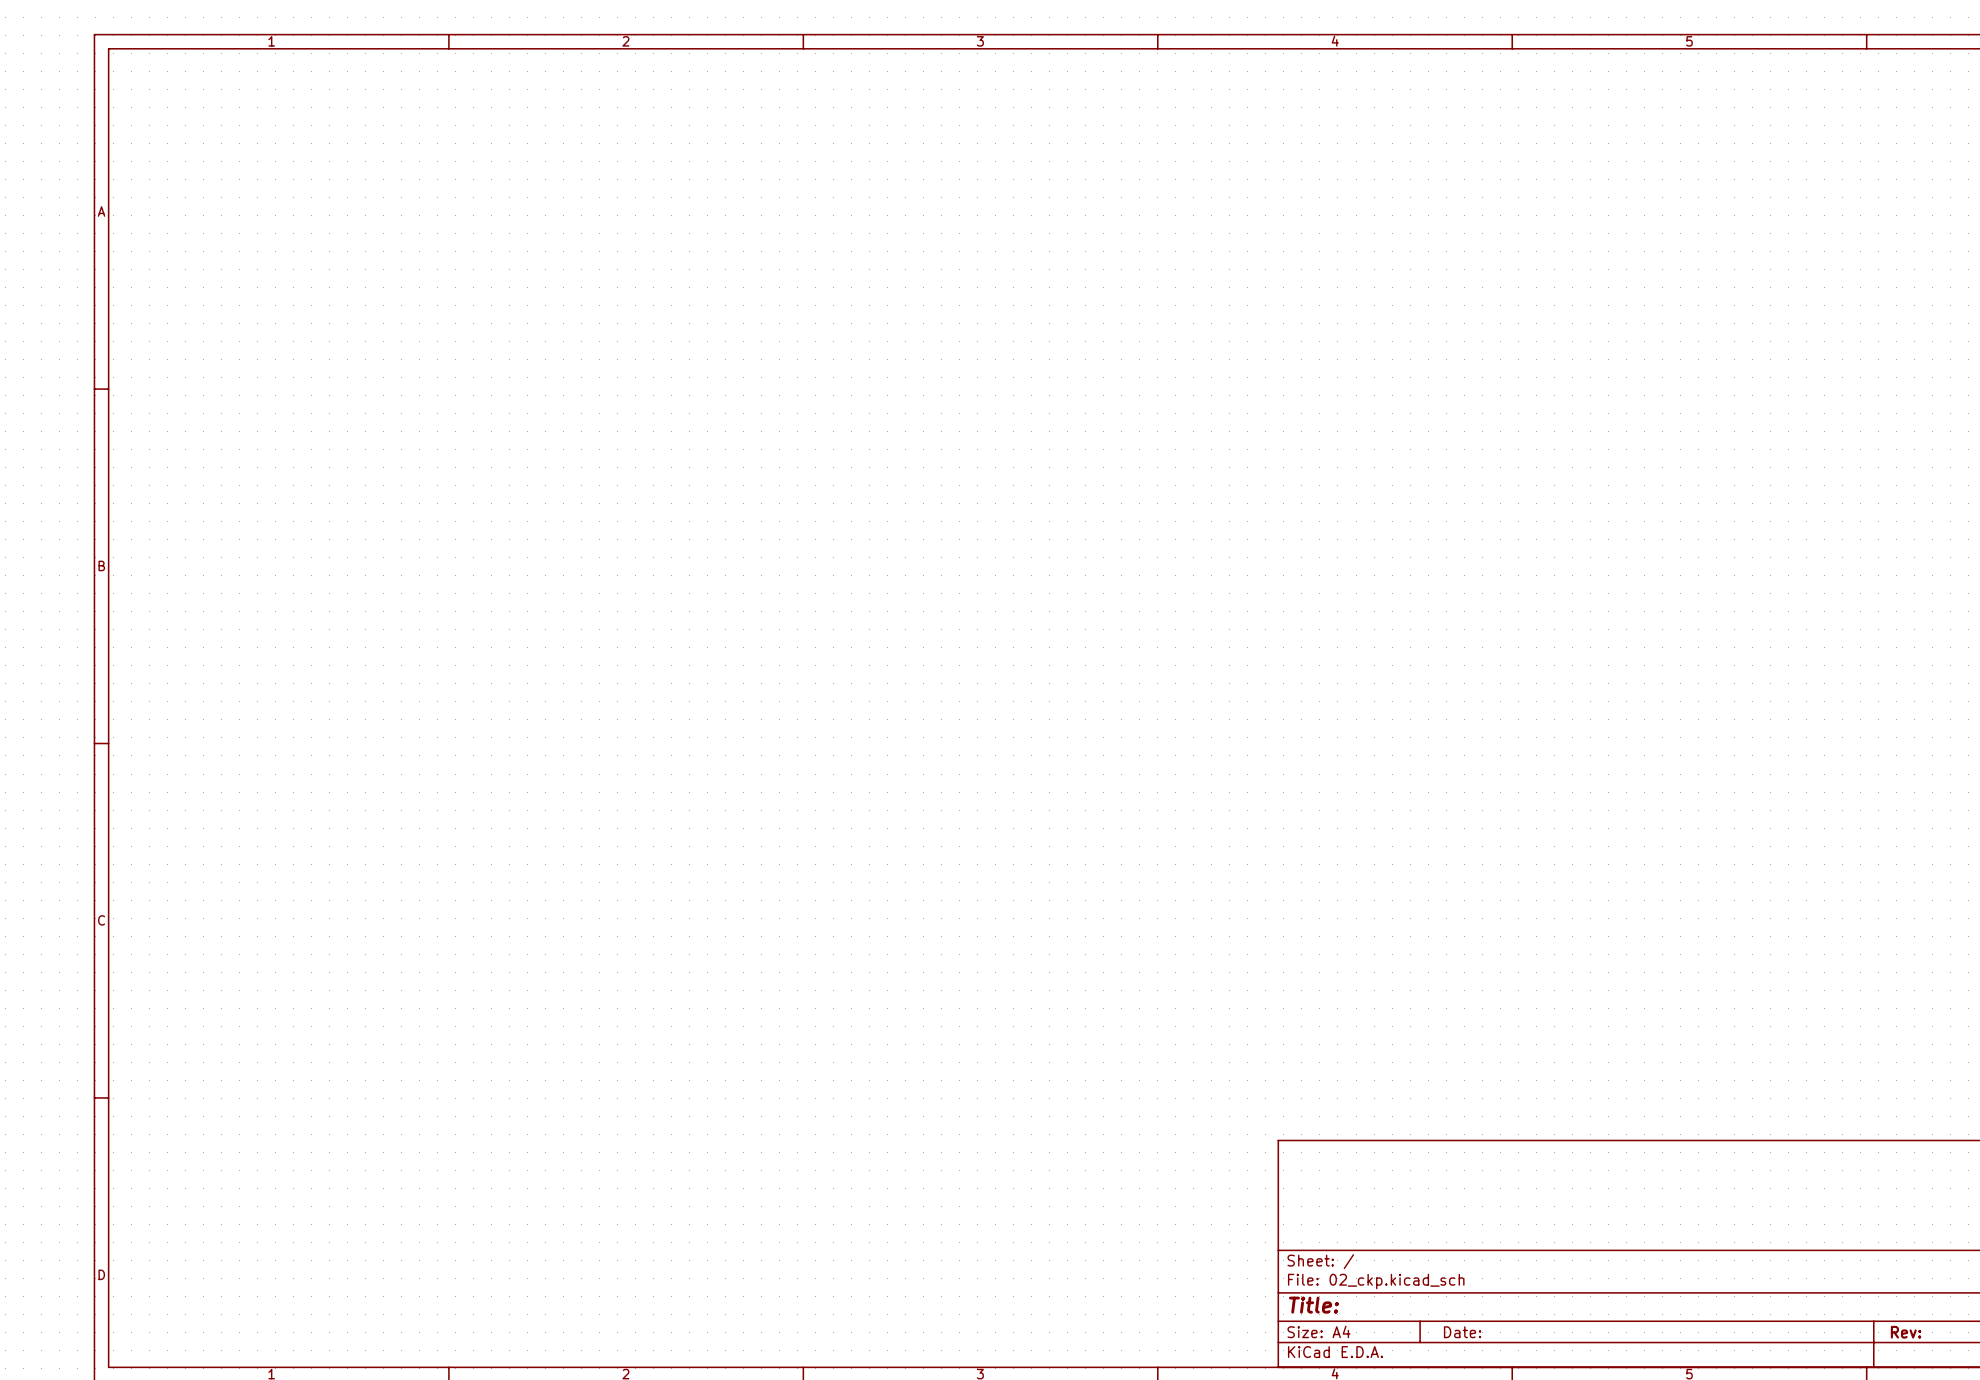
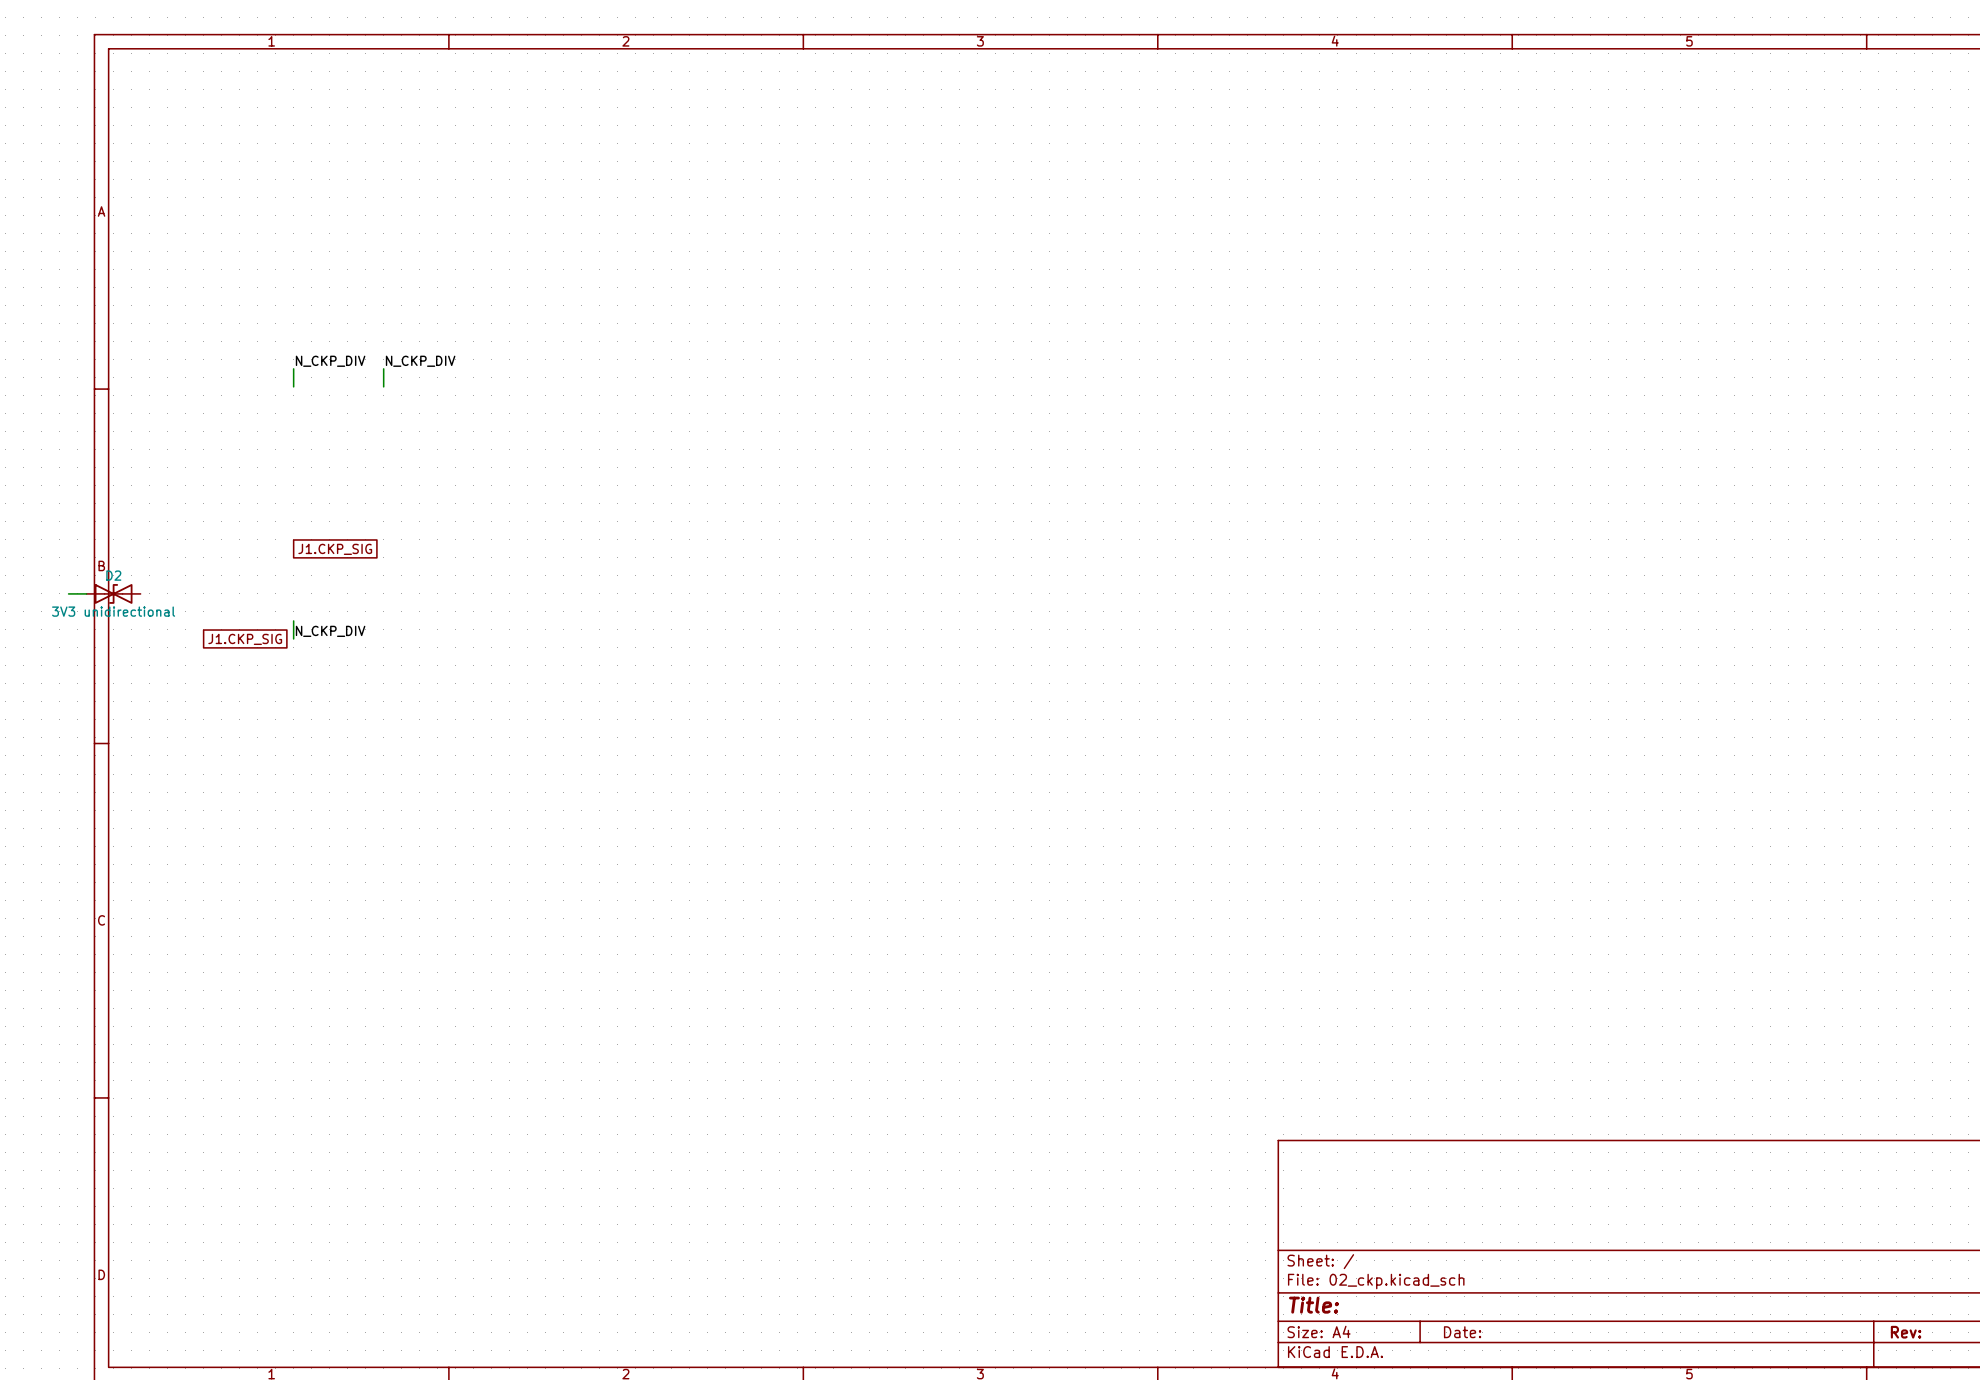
label: none -> N_CKP_DIV (330, 361)
label: none -> N_CKP_DIV (420, 361)
wire: none -> (293, 368) (293, 386)
wire: none -> (383, 368) (383, 386)
global label: none -> J1.CKP_SIG (335, 549)
wire: none -> (68, 593) (86, 593)
D2: none -> 3V3 unidirectional (113, 593)
wire: none -> (293, 620) (293, 638)
label: none -> N_CKP_DIV (330, 631)
global label: none -> J1.CKP_SIG (245, 639)

